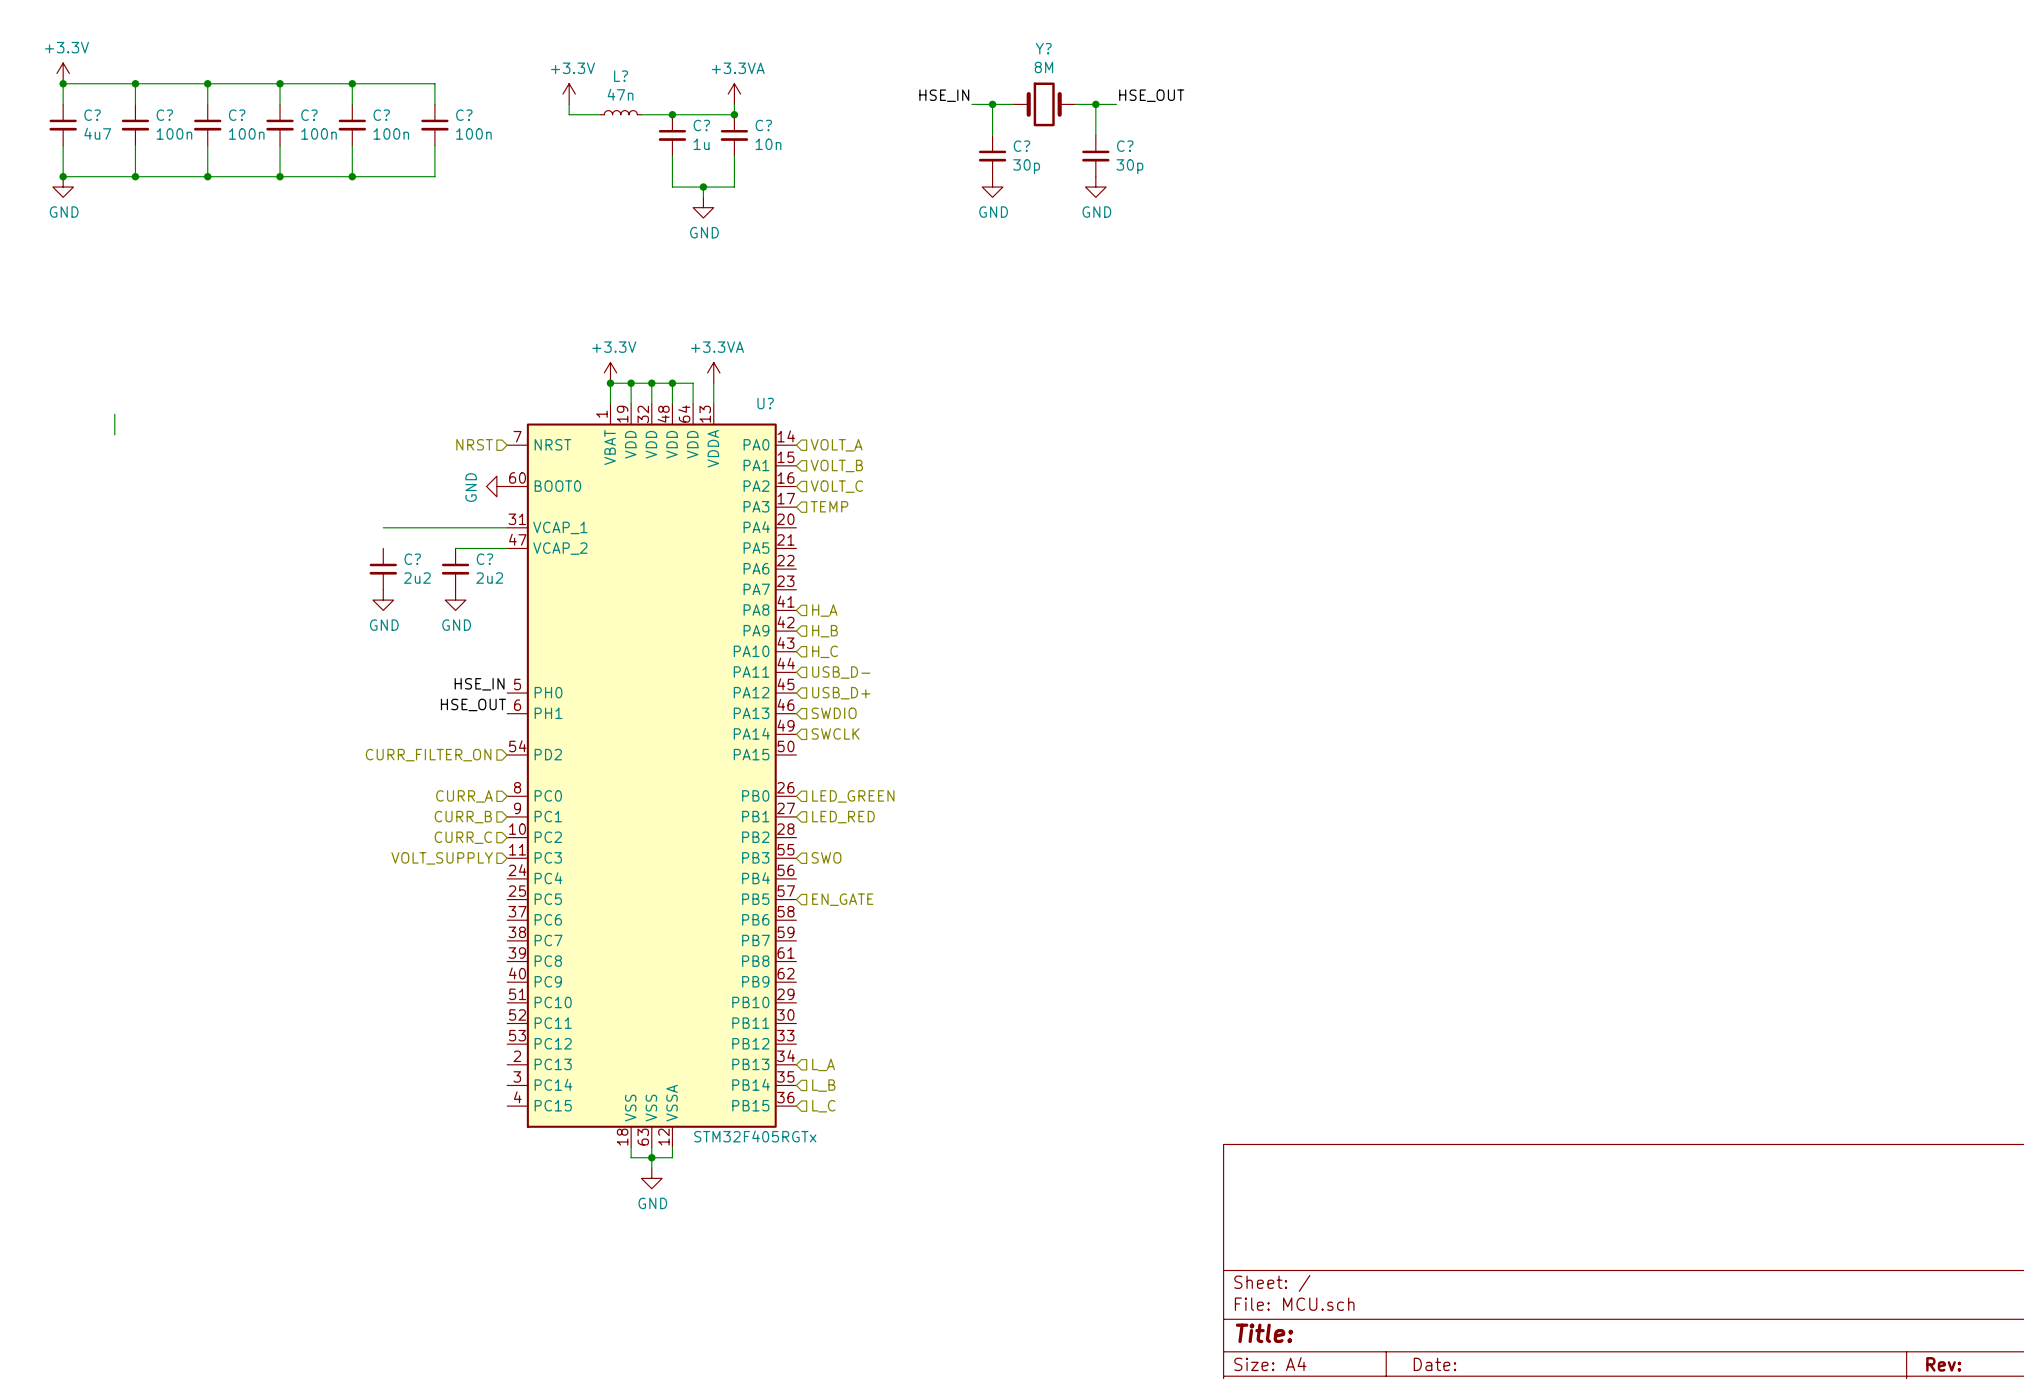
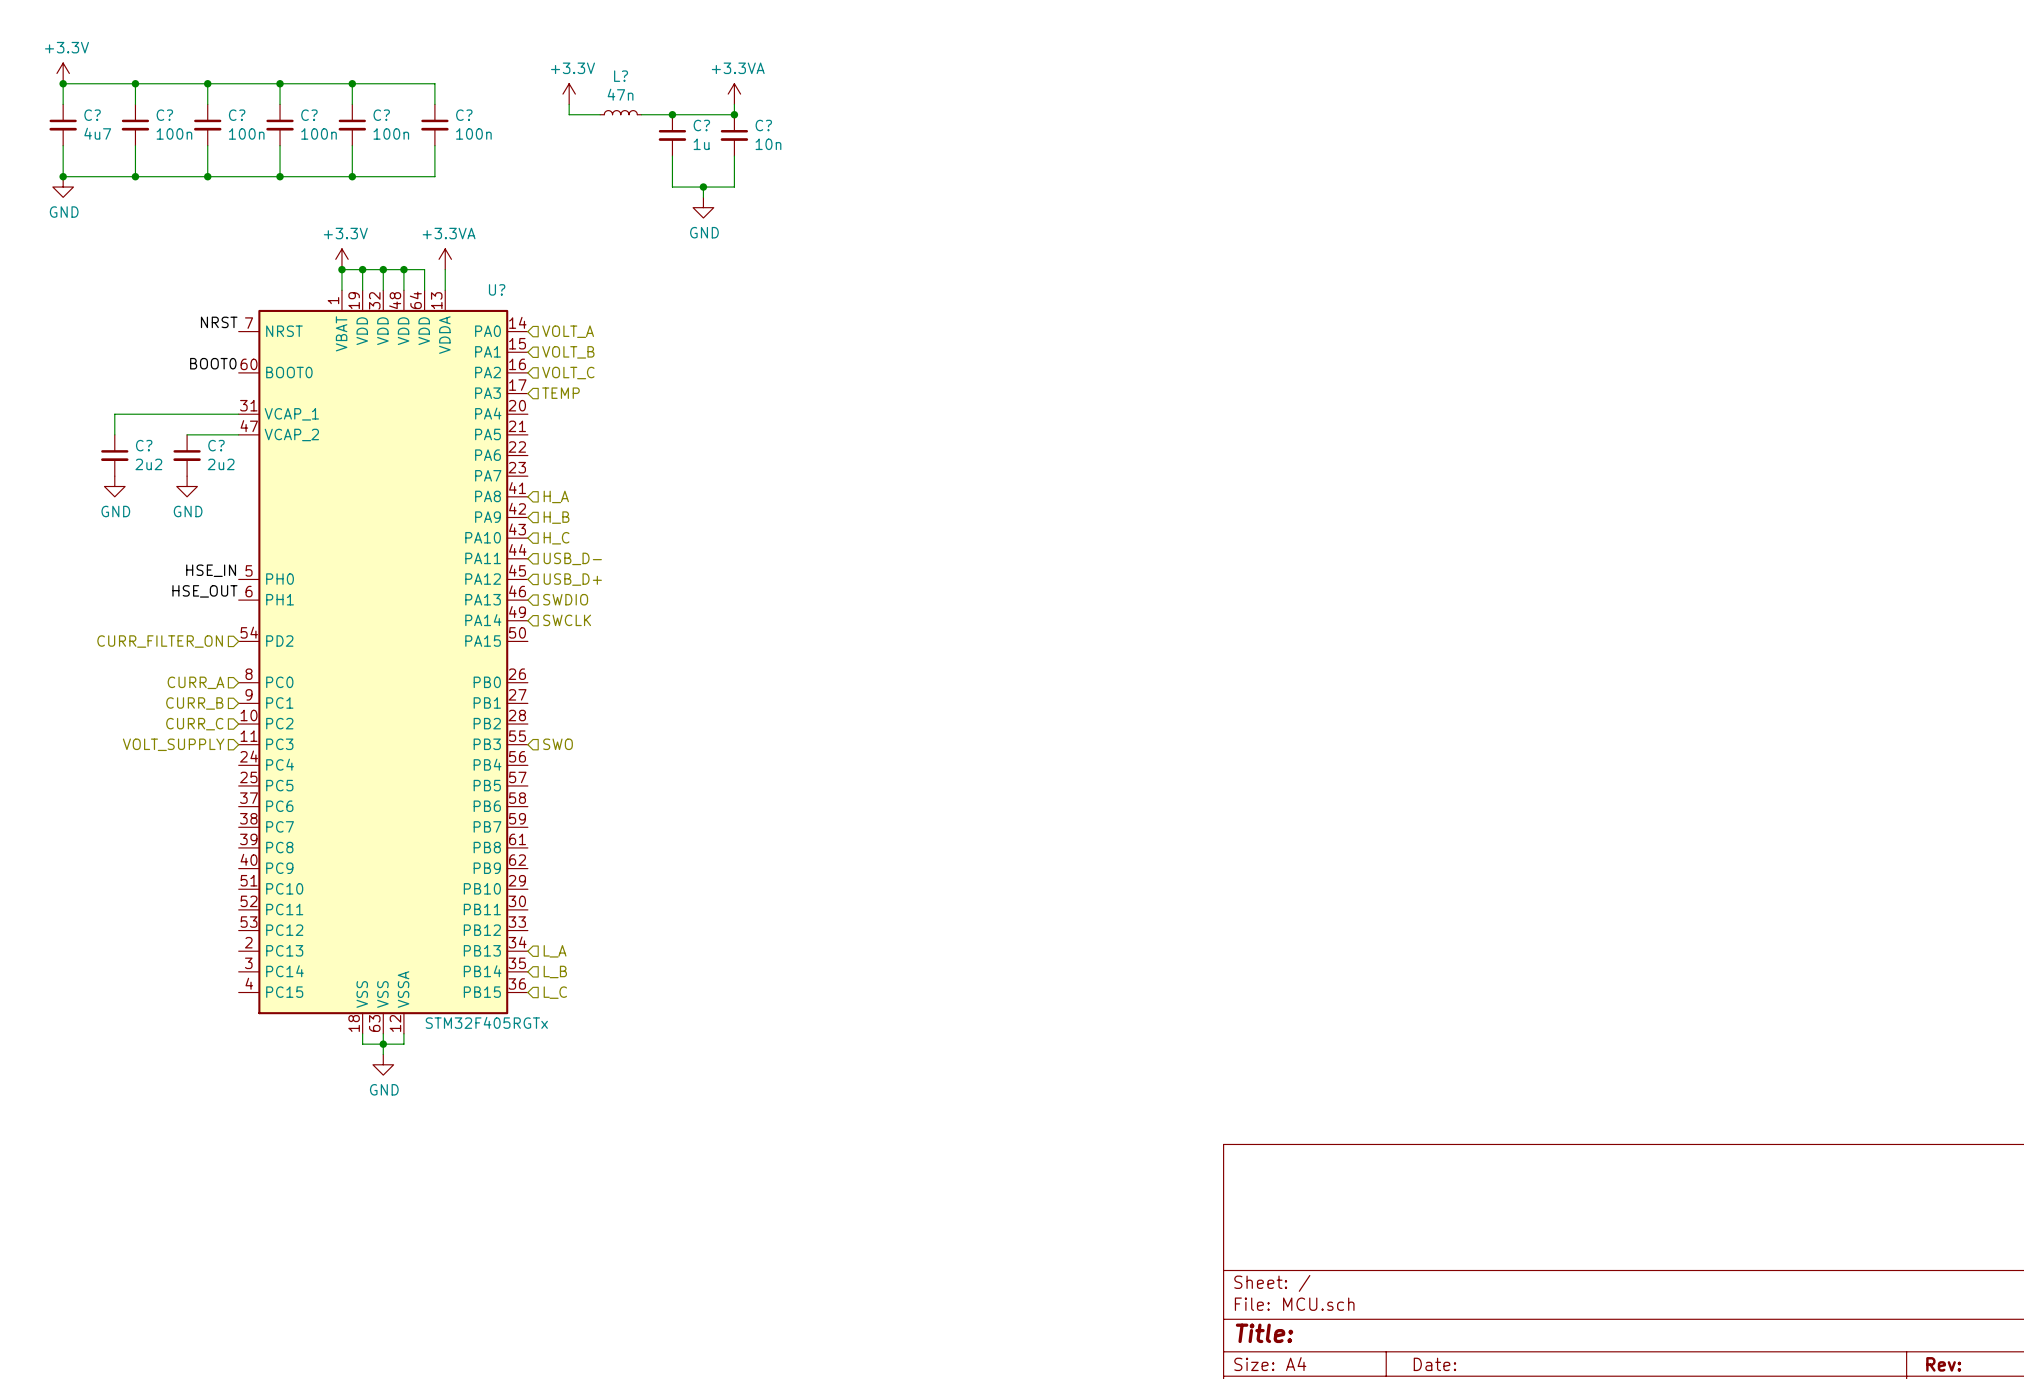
label: HSE_IN (944, 95) -> none
label: HSE_OUT (1151, 95) -> none
wire: (971, 104) (1013, 104) -> none
wire: (992, 104) (992, 135) -> none
junction: (992, 104) -> none
Y?: 8M (1044, 104) -> none
wire: (1075, 104) (1116, 104) -> none
wire: (1095, 104) (1095, 135) -> none
junction: (1095, 104) -> none
C?: 30p (992, 156) -> none
C?: 30p (1095, 156) -> none
power symbol: GND (992, 187) -> none
power symbol: GND (1095, 187) -> none
power symbol: none -> +3.3V (341, 259)
power symbol: none -> +3.3VA (445, 259)
junction: none -> (341, 269)
wire: none -> (362, 269) (362, 290)
junction: none -> (362, 269)
wire: none -> (383, 269) (383, 290)
junction: none -> (383, 269)
wire: none -> (403, 269) (403, 290)
junction: none -> (403, 269)
wire: none -> (445, 269) (445, 290)
wire: none -> (341, 290) (341, 269) (424, 269) (424, 290)
label: none -> NRST (219, 322)
hierarchical label: none -> VOLT_A (568, 331)
hierarchical label: none -> VOLT_B (568, 352)
label: none -> BOOT0 (213, 363)
power symbol: +3.3V (610, 372) -> none
power symbol: +3.3VA (713, 372) -> none
hierarchical label: none -> VOLT_C (568, 373)
junction: (610, 383) -> none
wire: (631, 383) (631, 403) -> none
junction: (631, 383) -> none
wire: (651, 383) (651, 403) -> none
junction: (651, 383) -> none
wire: (672, 383) (672, 403) -> none
junction: (672, 383) -> none
wire: (713, 383) (713, 403) -> none
hierarchical label: none -> TEMP (560, 393)
wire: (610, 403) (610, 383) (693, 383) (693, 403) -> none
wire: none -> (114, 414) (238, 414)
wire: none -> (187, 434) (238, 434)
hierarchical label: NRST (474, 444) -> none
hierarchical label: VOLT_A (836, 445) -> none
C?: none -> 2u2 (114, 455)
C?: none -> 2u2 (187, 455)
hierarchical label: VOLT_B (836, 465) -> none
power symbol: none -> GND (114, 486)
power symbol: none -> GND (187, 486)
power symbol: GND (496, 486) -> none
hierarchical label: VOLT_C (836, 486) -> none
hierarchical label: none -> H_A (556, 496)
hierarchical label: TEMP (829, 506) -> none
hierarchical label: none -> H_B (556, 517)
hierarchical label: none -> H_C (556, 538)
hierarchical label: none -> USB_D- (572, 558)
C?: 2u2 (383, 569) -> none
C?: 2u2 (455, 569) -> none
label: none -> HSE_IN (211, 570)
hierarchical label: none -> USB_D+ (572, 579)
label: none -> HSE_OUT (204, 591)
hierarchical label: none -> SWDIO (565, 599)
power symbol: GND (383, 600) -> none
power symbol: GND (455, 600) -> none
hierarchical label: H_A (824, 610) -> none
hierarchical label: none -> SWCLK (567, 620)
hierarchical label: H_B (825, 631) -> none
hierarchical label: none -> CURR_FILTER_ON (160, 641)
hierarchical label: H_C (825, 651) -> none
U?: none -> STM32F405RGTx (383, 662)
hierarchical label: USB_D- (841, 672) -> none
hierarchical label: none -> CURR_A (196, 682)
label: HSE_IN (479, 684) -> none
hierarchical label: USB_D+ (841, 693) -> none
hierarchical label: none -> CURR_B (194, 703)
label: HSE_OUT (473, 704) -> none
hierarchical label: SWDIO (834, 713) -> none
hierarchical label: none -> CURR_C (194, 724)
hierarchical label: SWCLK (835, 733) -> none
hierarchical label: none -> VOLT_SUPPLY (173, 744)
hierarchical label: none -> SWO (558, 744)
hierarchical label: CURR_FILTER_ON (428, 755) -> none
U?: STM32F405RGTx (651, 775) -> none
hierarchical label: CURR_A (464, 796) -> none
hierarchical label: LED_GREEN (853, 796) -> none
hierarchical label: CURR_B (463, 817) -> none
hierarchical label: LED_RED (843, 817) -> none
hierarchical label: CURR_C (463, 837) -> none
hierarchical label: SWO (826, 857) -> none
hierarchical label: VOLT_SUPPLY (442, 858) -> none
hierarchical label: EN_GATE (842, 899) -> none
hierarchical label: none -> L_A (555, 951)
hierarchical label: none -> L_B (555, 971)
hierarchical label: none -> L_C (555, 992)
wire: none -> (362, 1033) (362, 1044) (403, 1044) (403, 1033)
wire: none -> (383, 1033) (383, 1054)
junction: none -> (383, 1044)
power symbol: none -> GND (383, 1064)
hierarchical label: L_A (823, 1064) -> none
hierarchical label: L_B (823, 1085) -> none
hierarchical label: L_C (823, 1106) -> none
wire: (631, 1147) (631, 1157) (672, 1157) (672, 1147) -> none
wire: (651, 1147) (651, 1168) -> none
junction: (651, 1157) -> none
power symbol: GND (651, 1178) -> none

